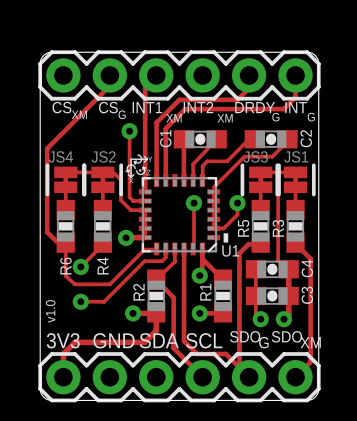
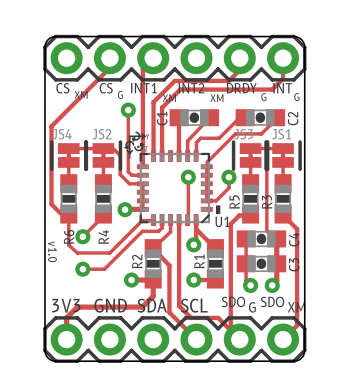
text rotation: 0° (50, 311) -> 180° (52, 251)

